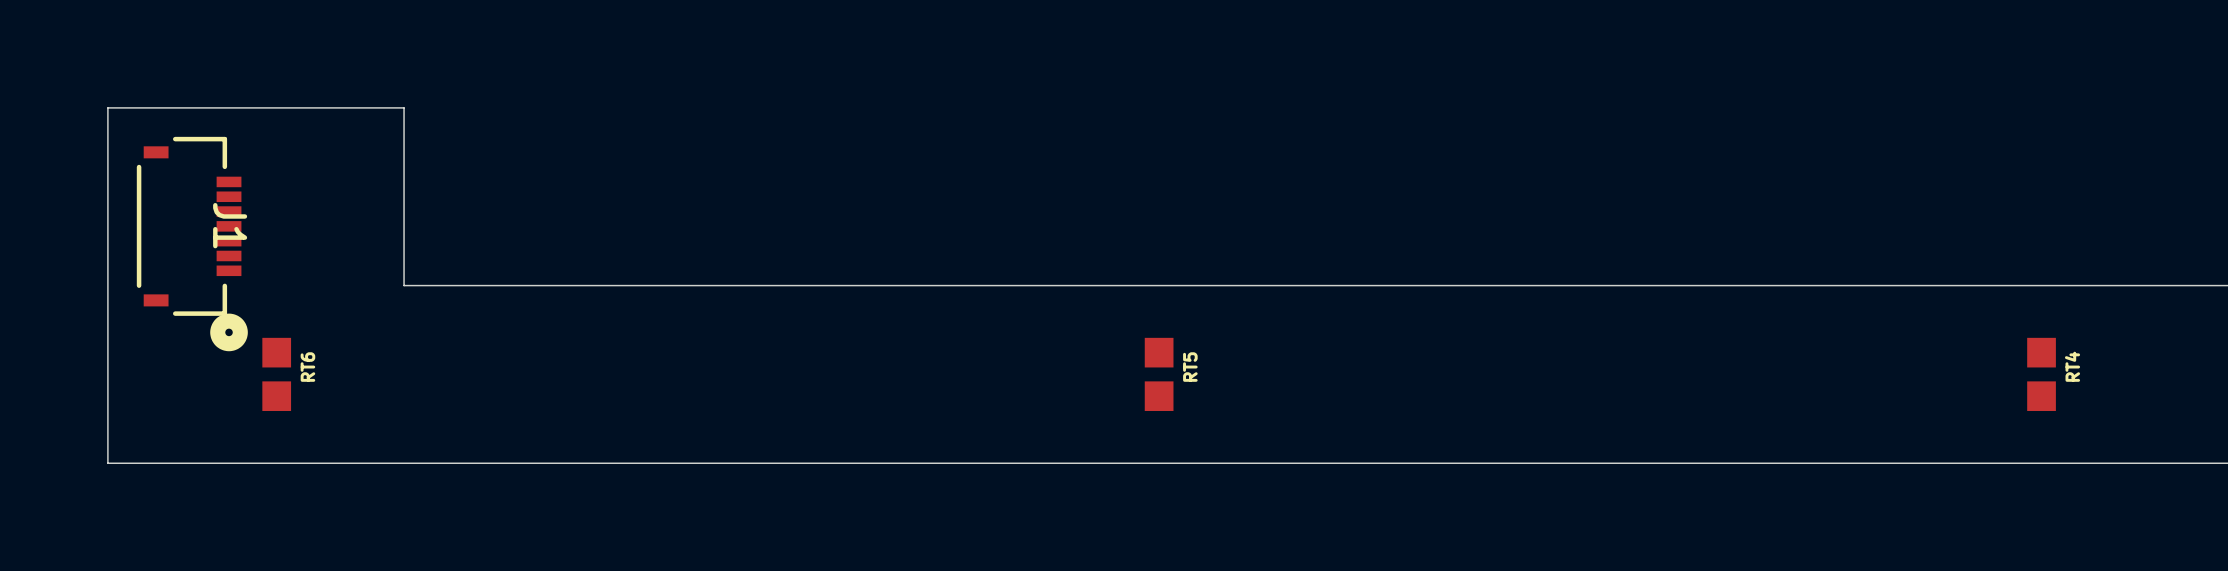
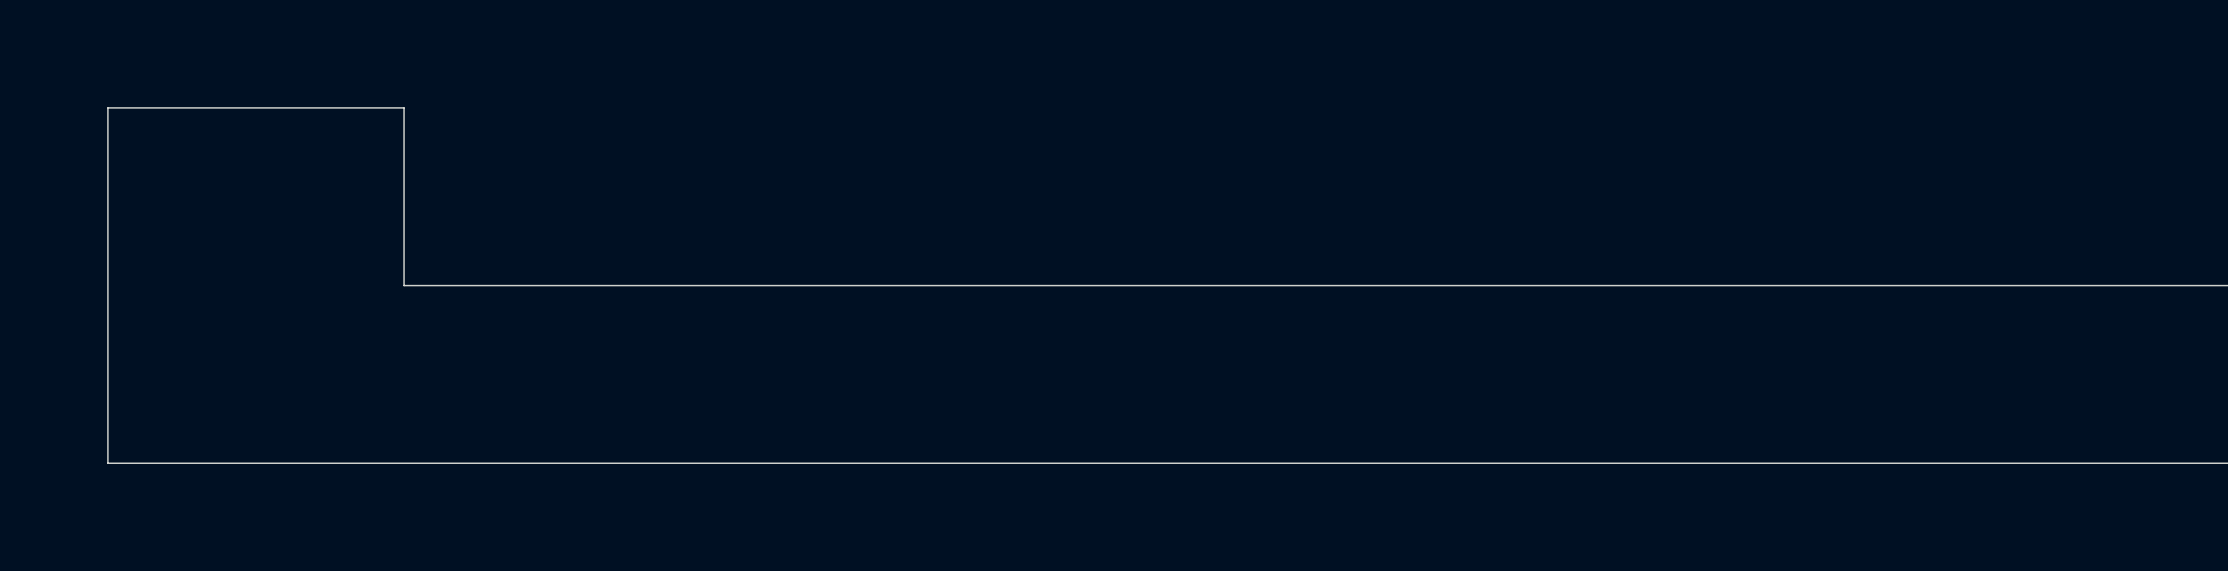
J1: (192, 244) -> none
RT6: (276, 374) -> none
RT5: (1159, 374) -> none
RT4: (2041, 374) -> none

